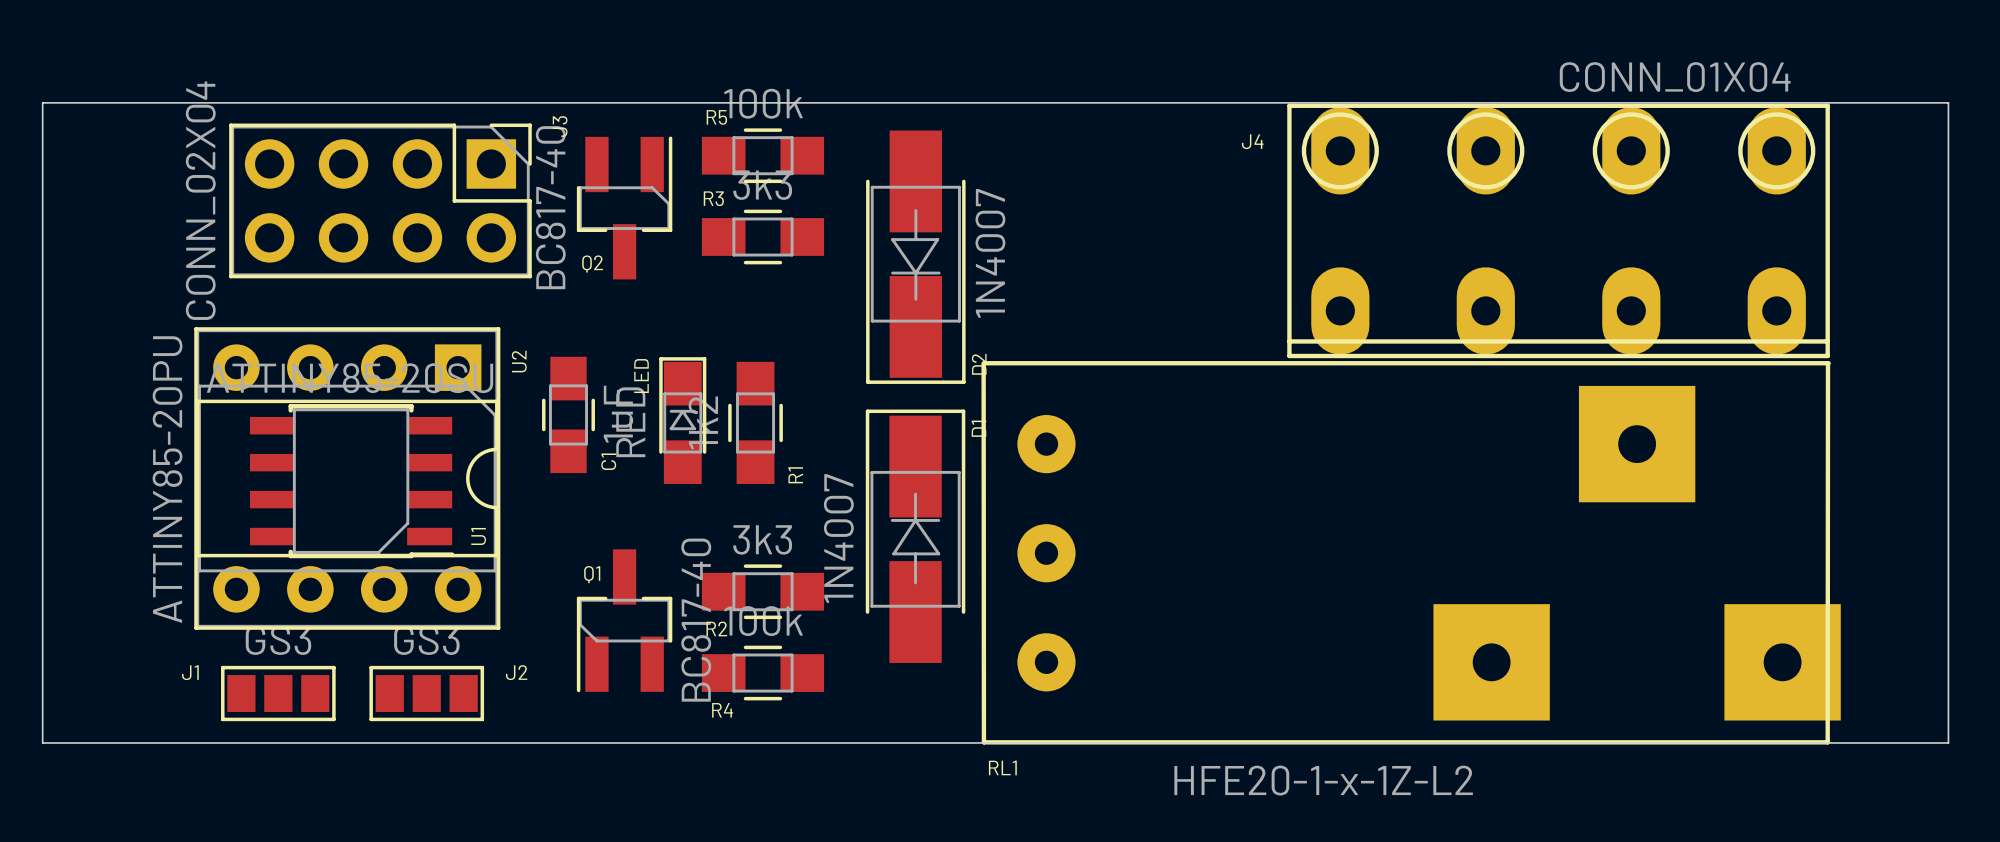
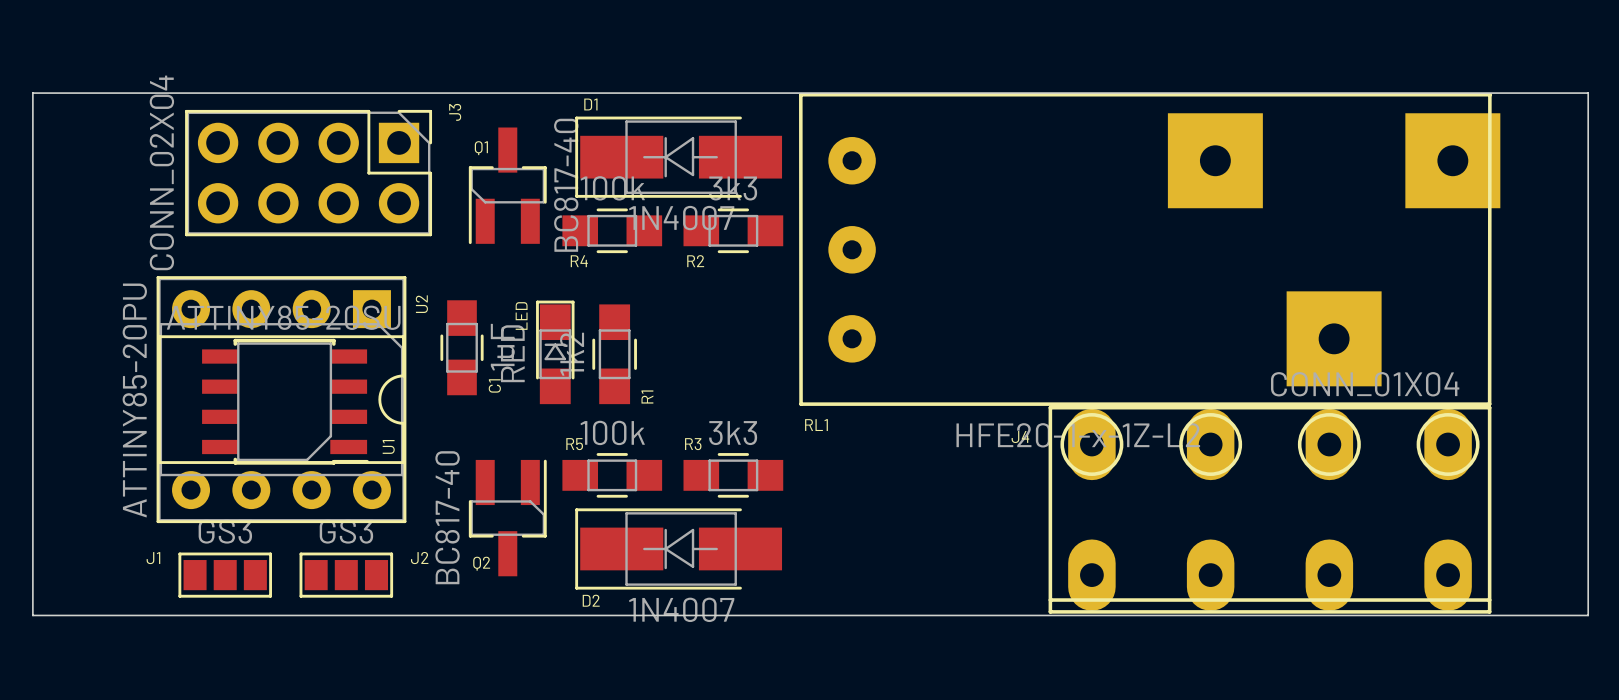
R5 position: (762, 155) -> (612, 475)
Q2 position: (624, 207) -> (507, 517)
J4 position: (1558, 230) -> (1270, 509)
R3 position: (762, 237) -> (733, 475)
D2 rotation: 0° (915, 257) -> 90° clockwise (678, 548)
D2 position: (915, 257) -> (678, 548)
RL1 footprint: [981, 361, 1841, 745] -> [799, 92, 1501, 406]
D1 rotation: 0° (915, 536) -> 90° counterclockwise (678, 157)
D1 position: (915, 536) -> (678, 157)
R2 position: (762, 591) -> (733, 230)
Q1 position: (624, 620) -> (507, 185)
R4 position: (762, 673) -> (612, 230)

